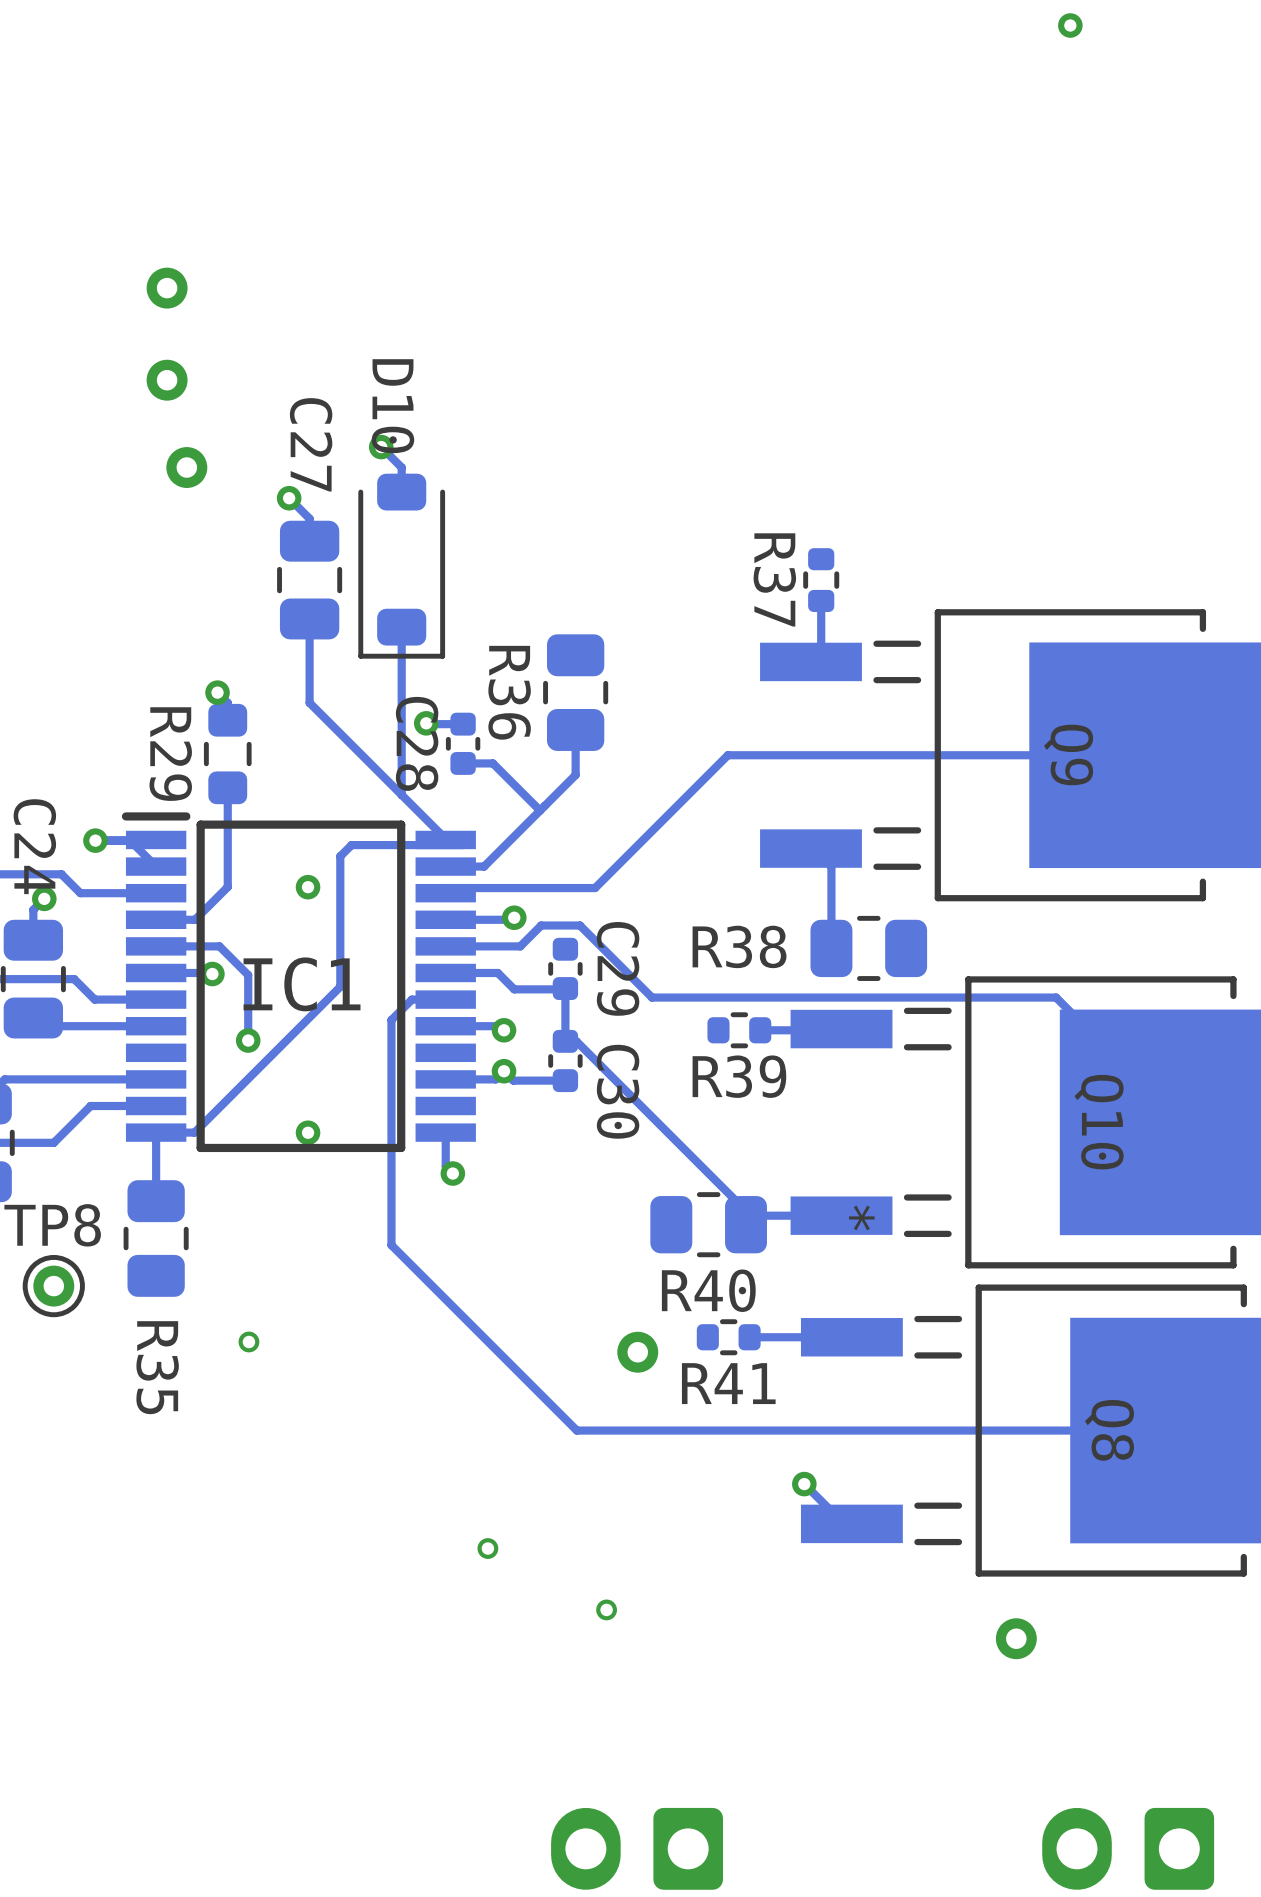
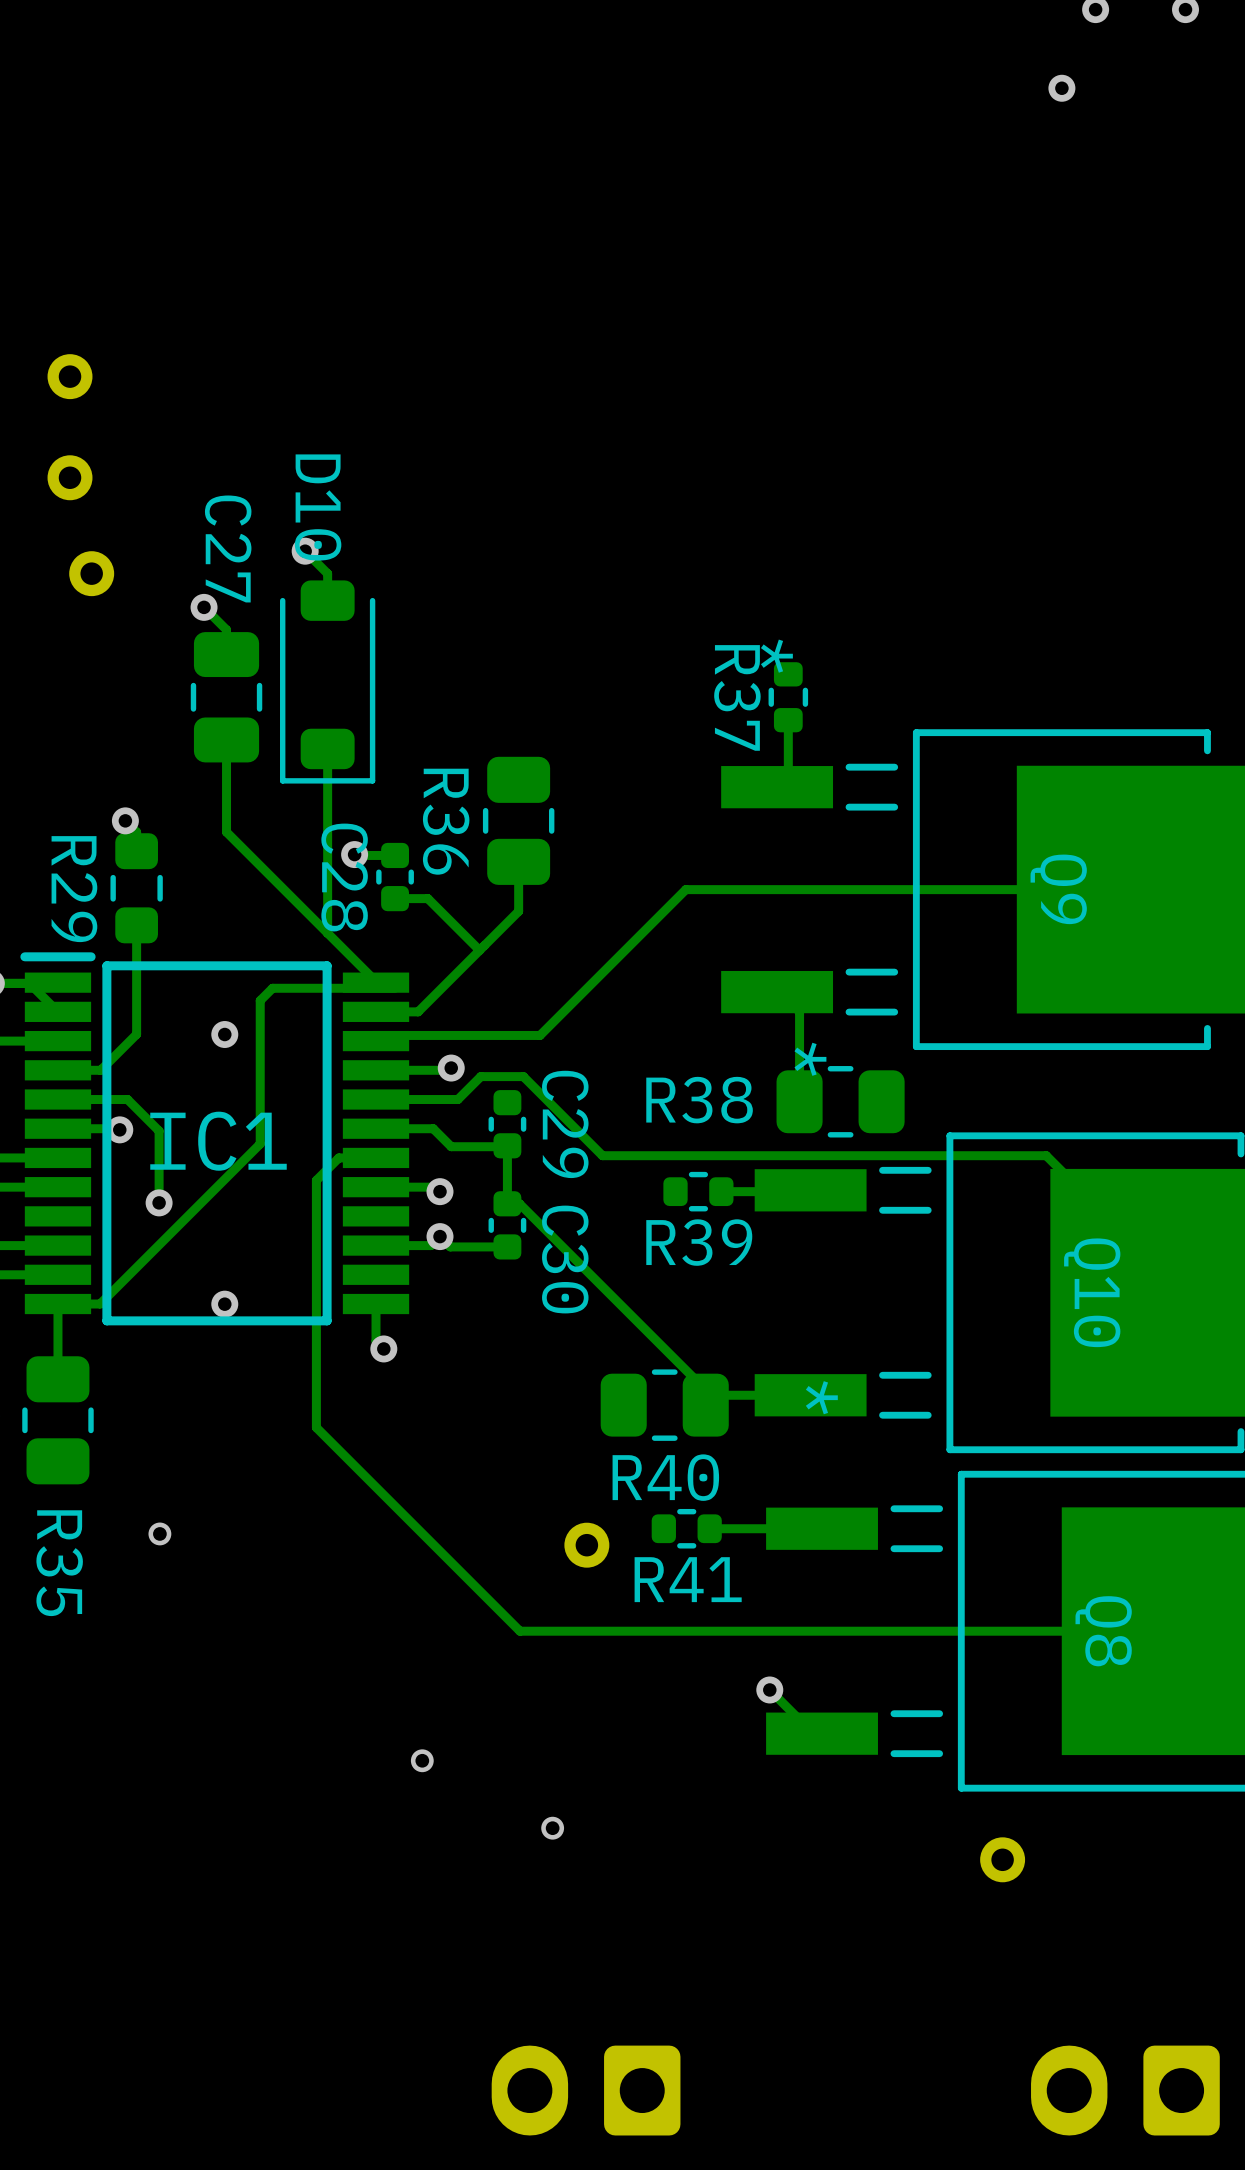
Q9 text: none -> * (776, 656)
Q10 text: none -> * (810, 1059)

